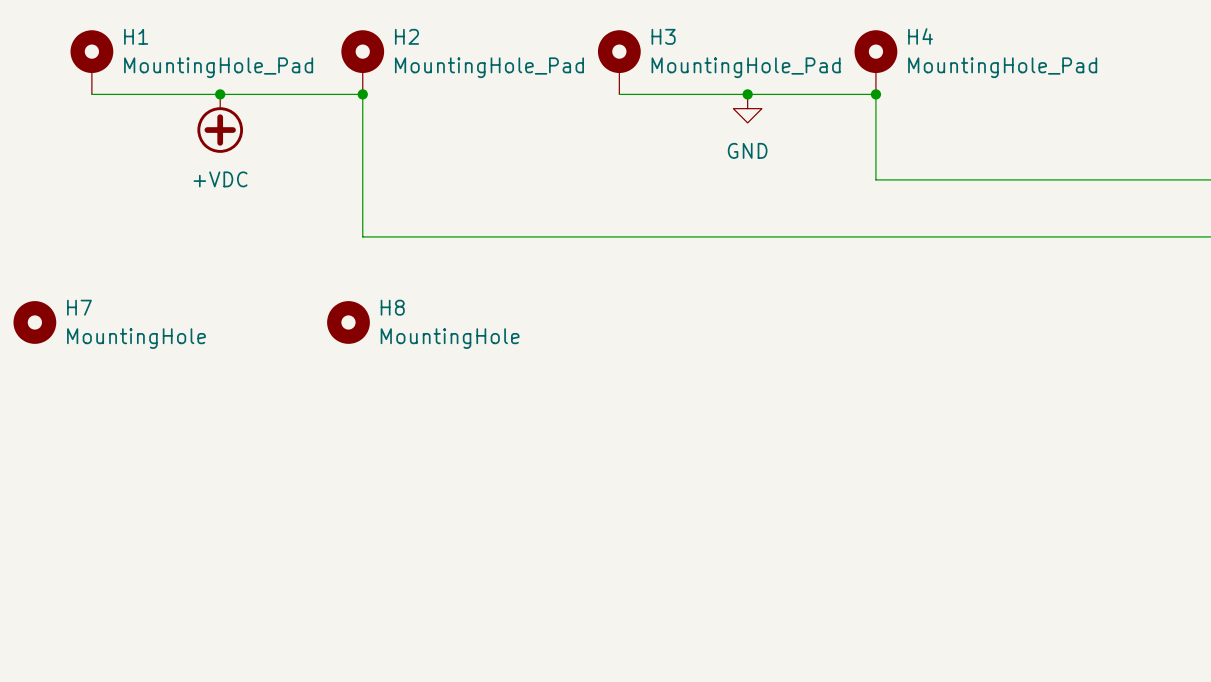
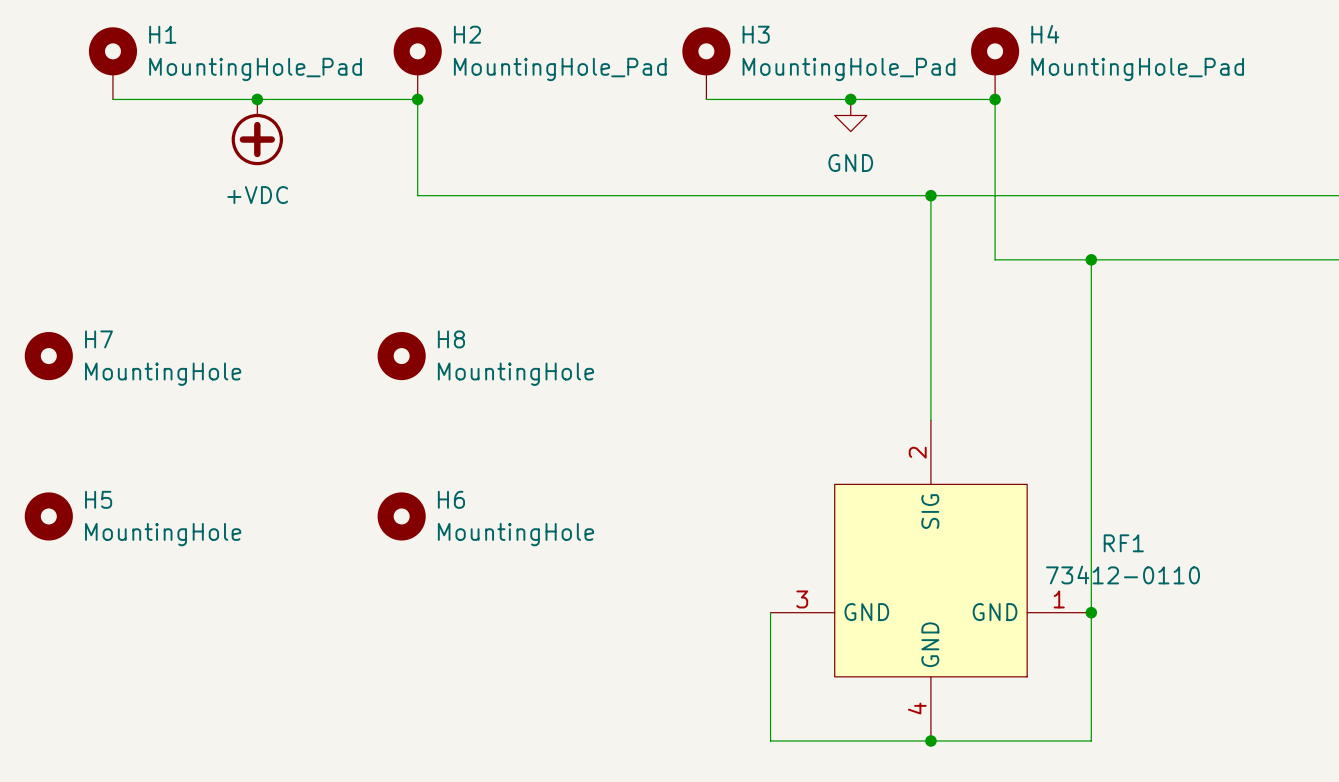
wire: (362, 179) (362, 236) (875, 236) -> (417, 195) (995, 195) (995, 259)
wire: none -> (930, 195) (930, 420)
junction: none -> (930, 195)
wire: none -> (1091, 259) (1091, 740) (770, 740) (770, 612)
junction: none -> (1091, 259)
H5: none -> MountingHole (48, 516)
H6: none -> MountingHole (401, 516)
RF1: none -> 73412-0110 (930, 580)
junction: none -> (1091, 612)
junction: none -> (930, 740)

